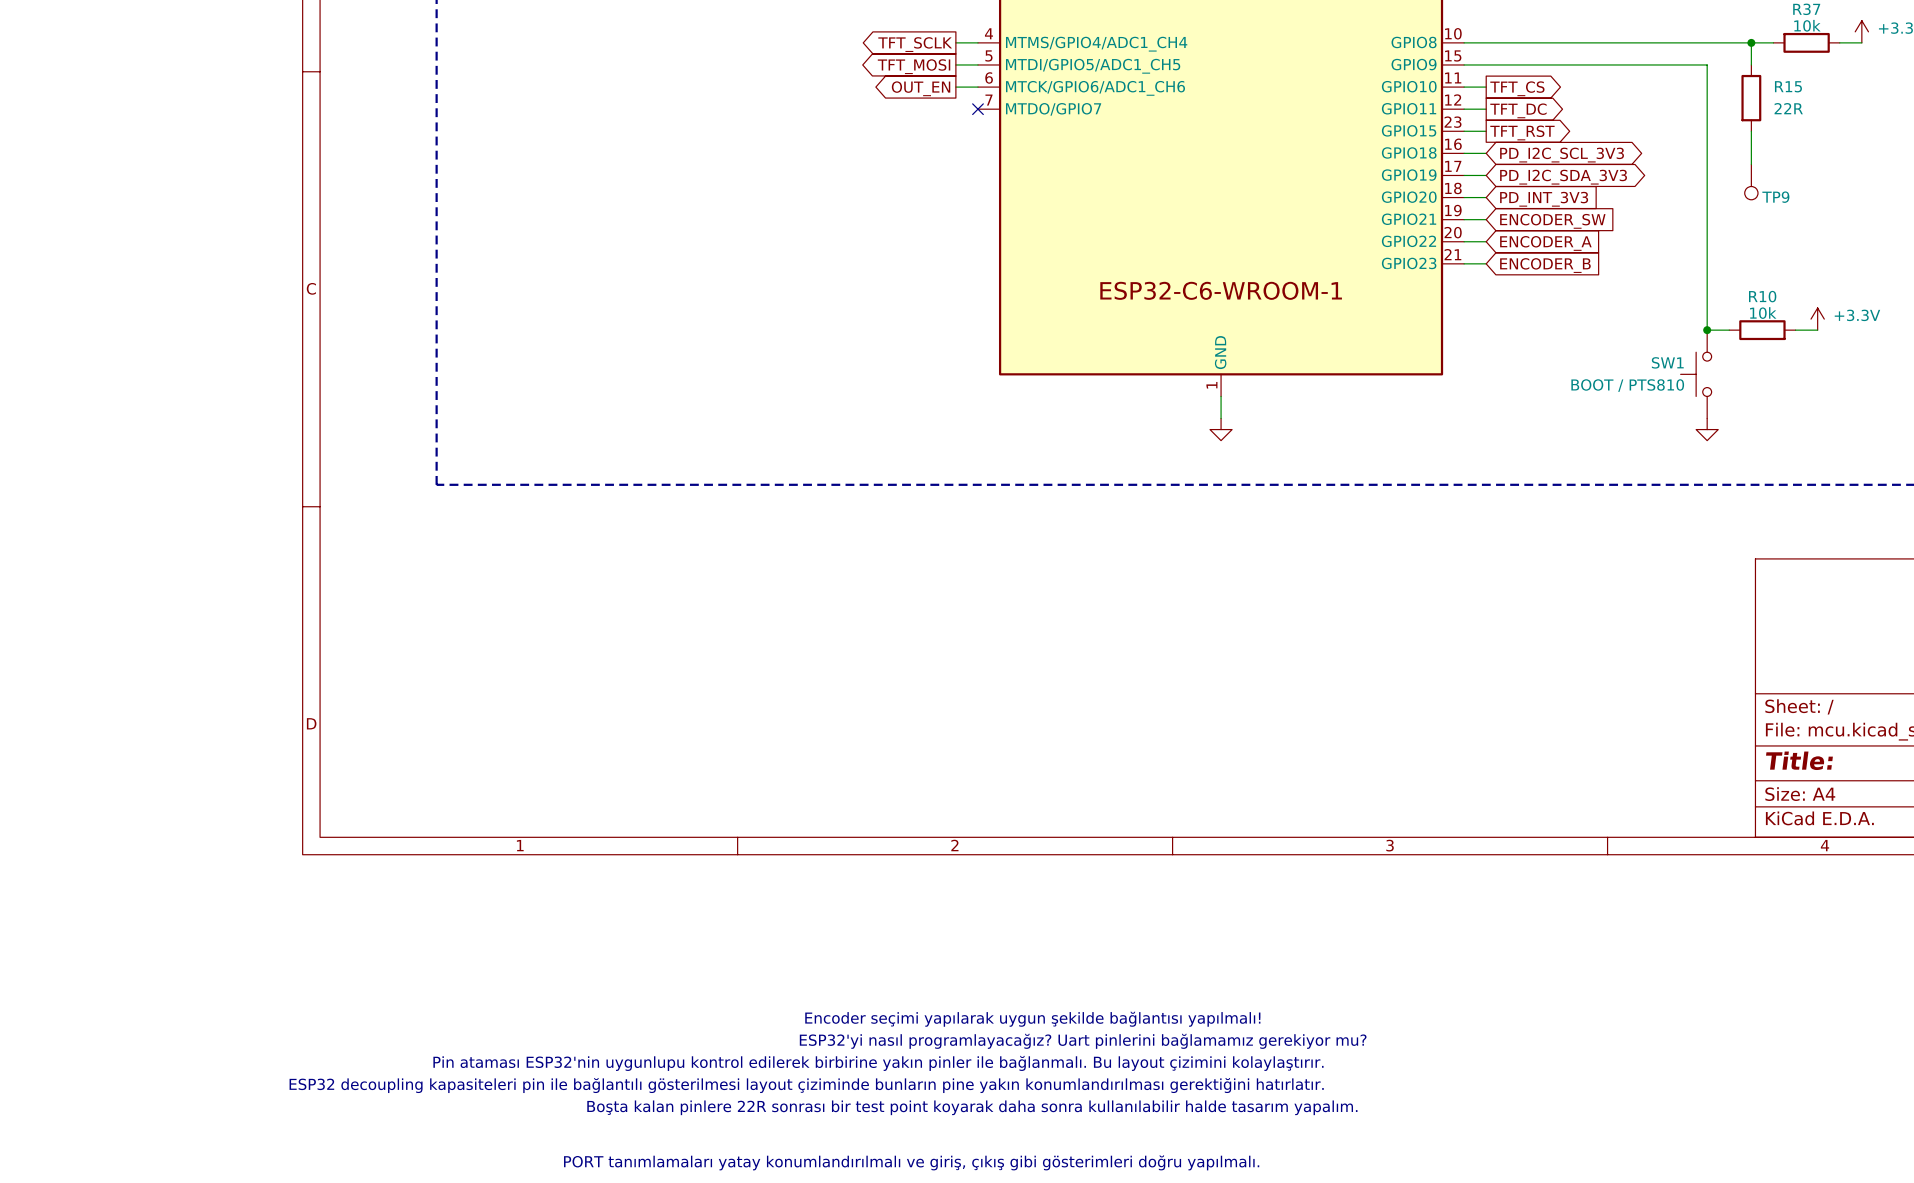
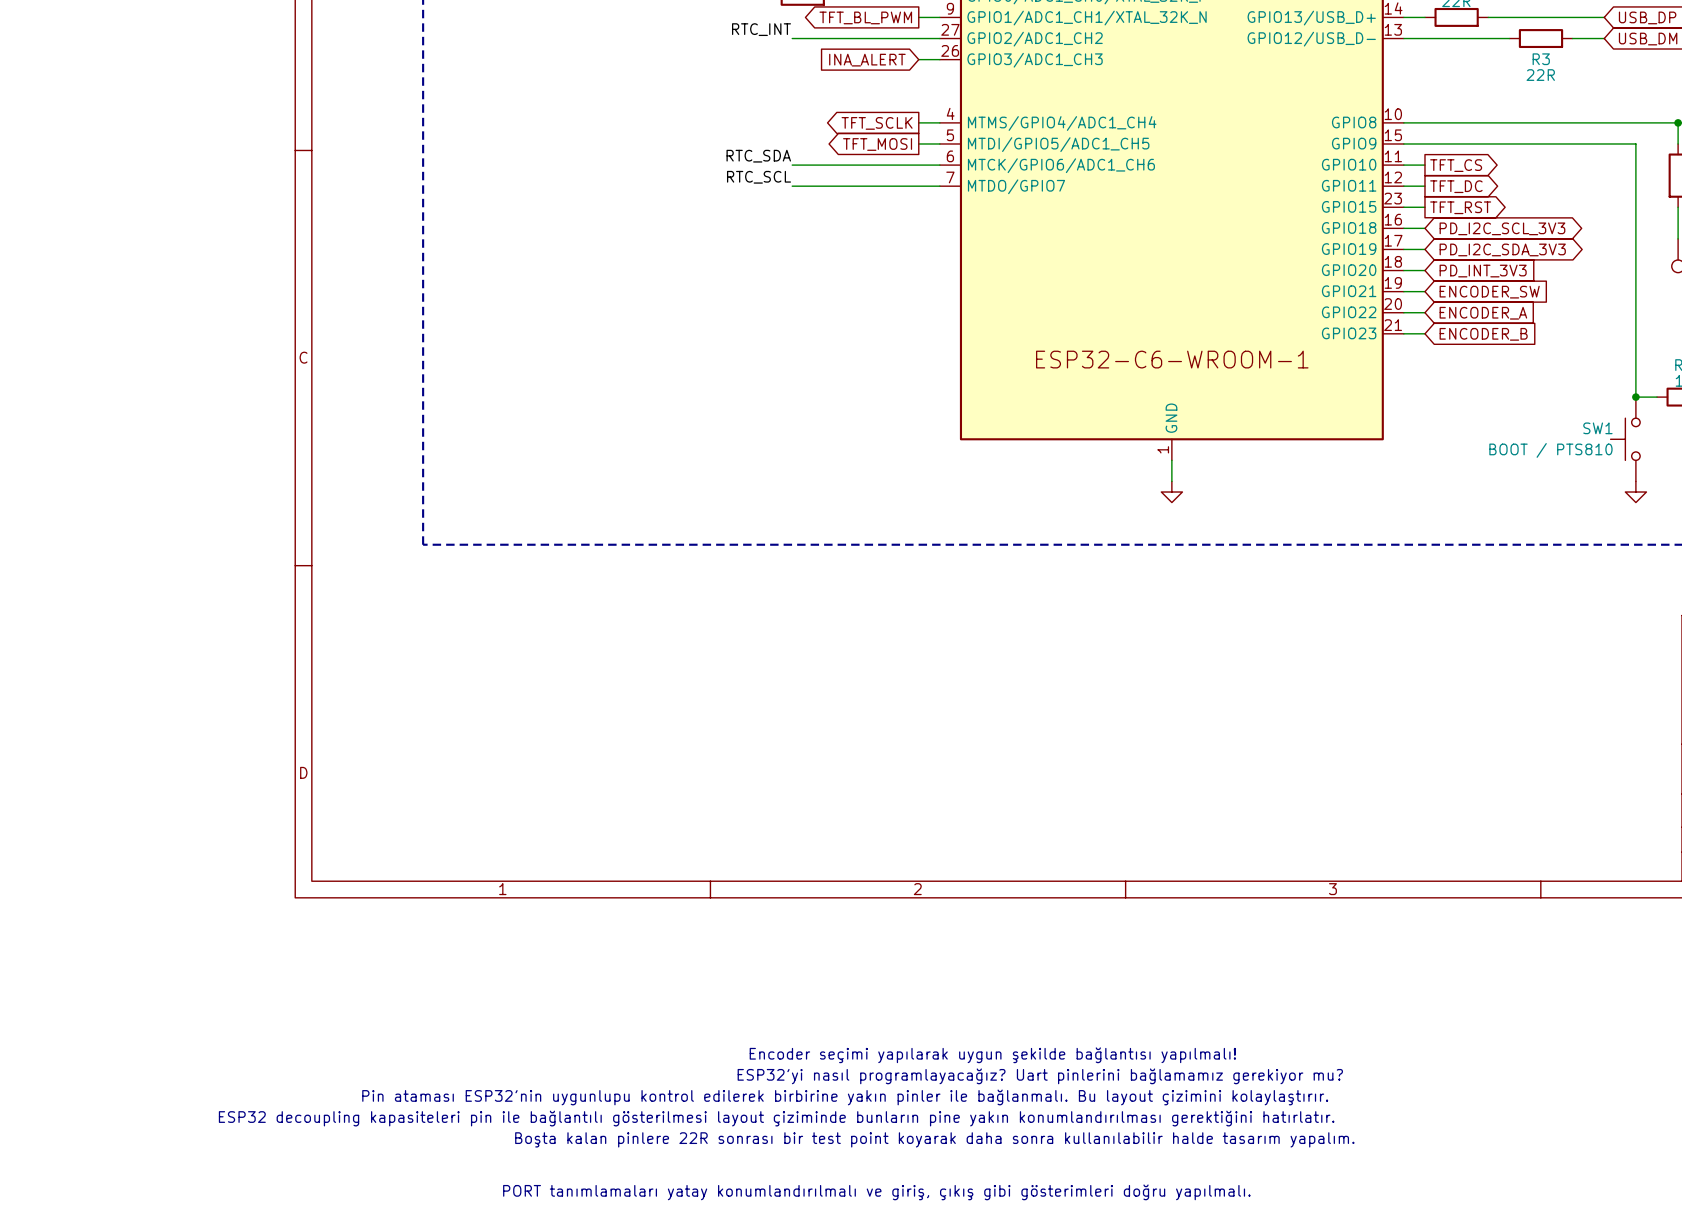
label: none -> RTC_SDA (758, 156)
wire: none -> (792, 165) (918, 165)
global label: OUT_EN (921, 88) -> none
label: none -> RTC_SCL (759, 177)
wire: none -> (792, 186) (939, 186)
no-connect mark: (977, 109) -> none

